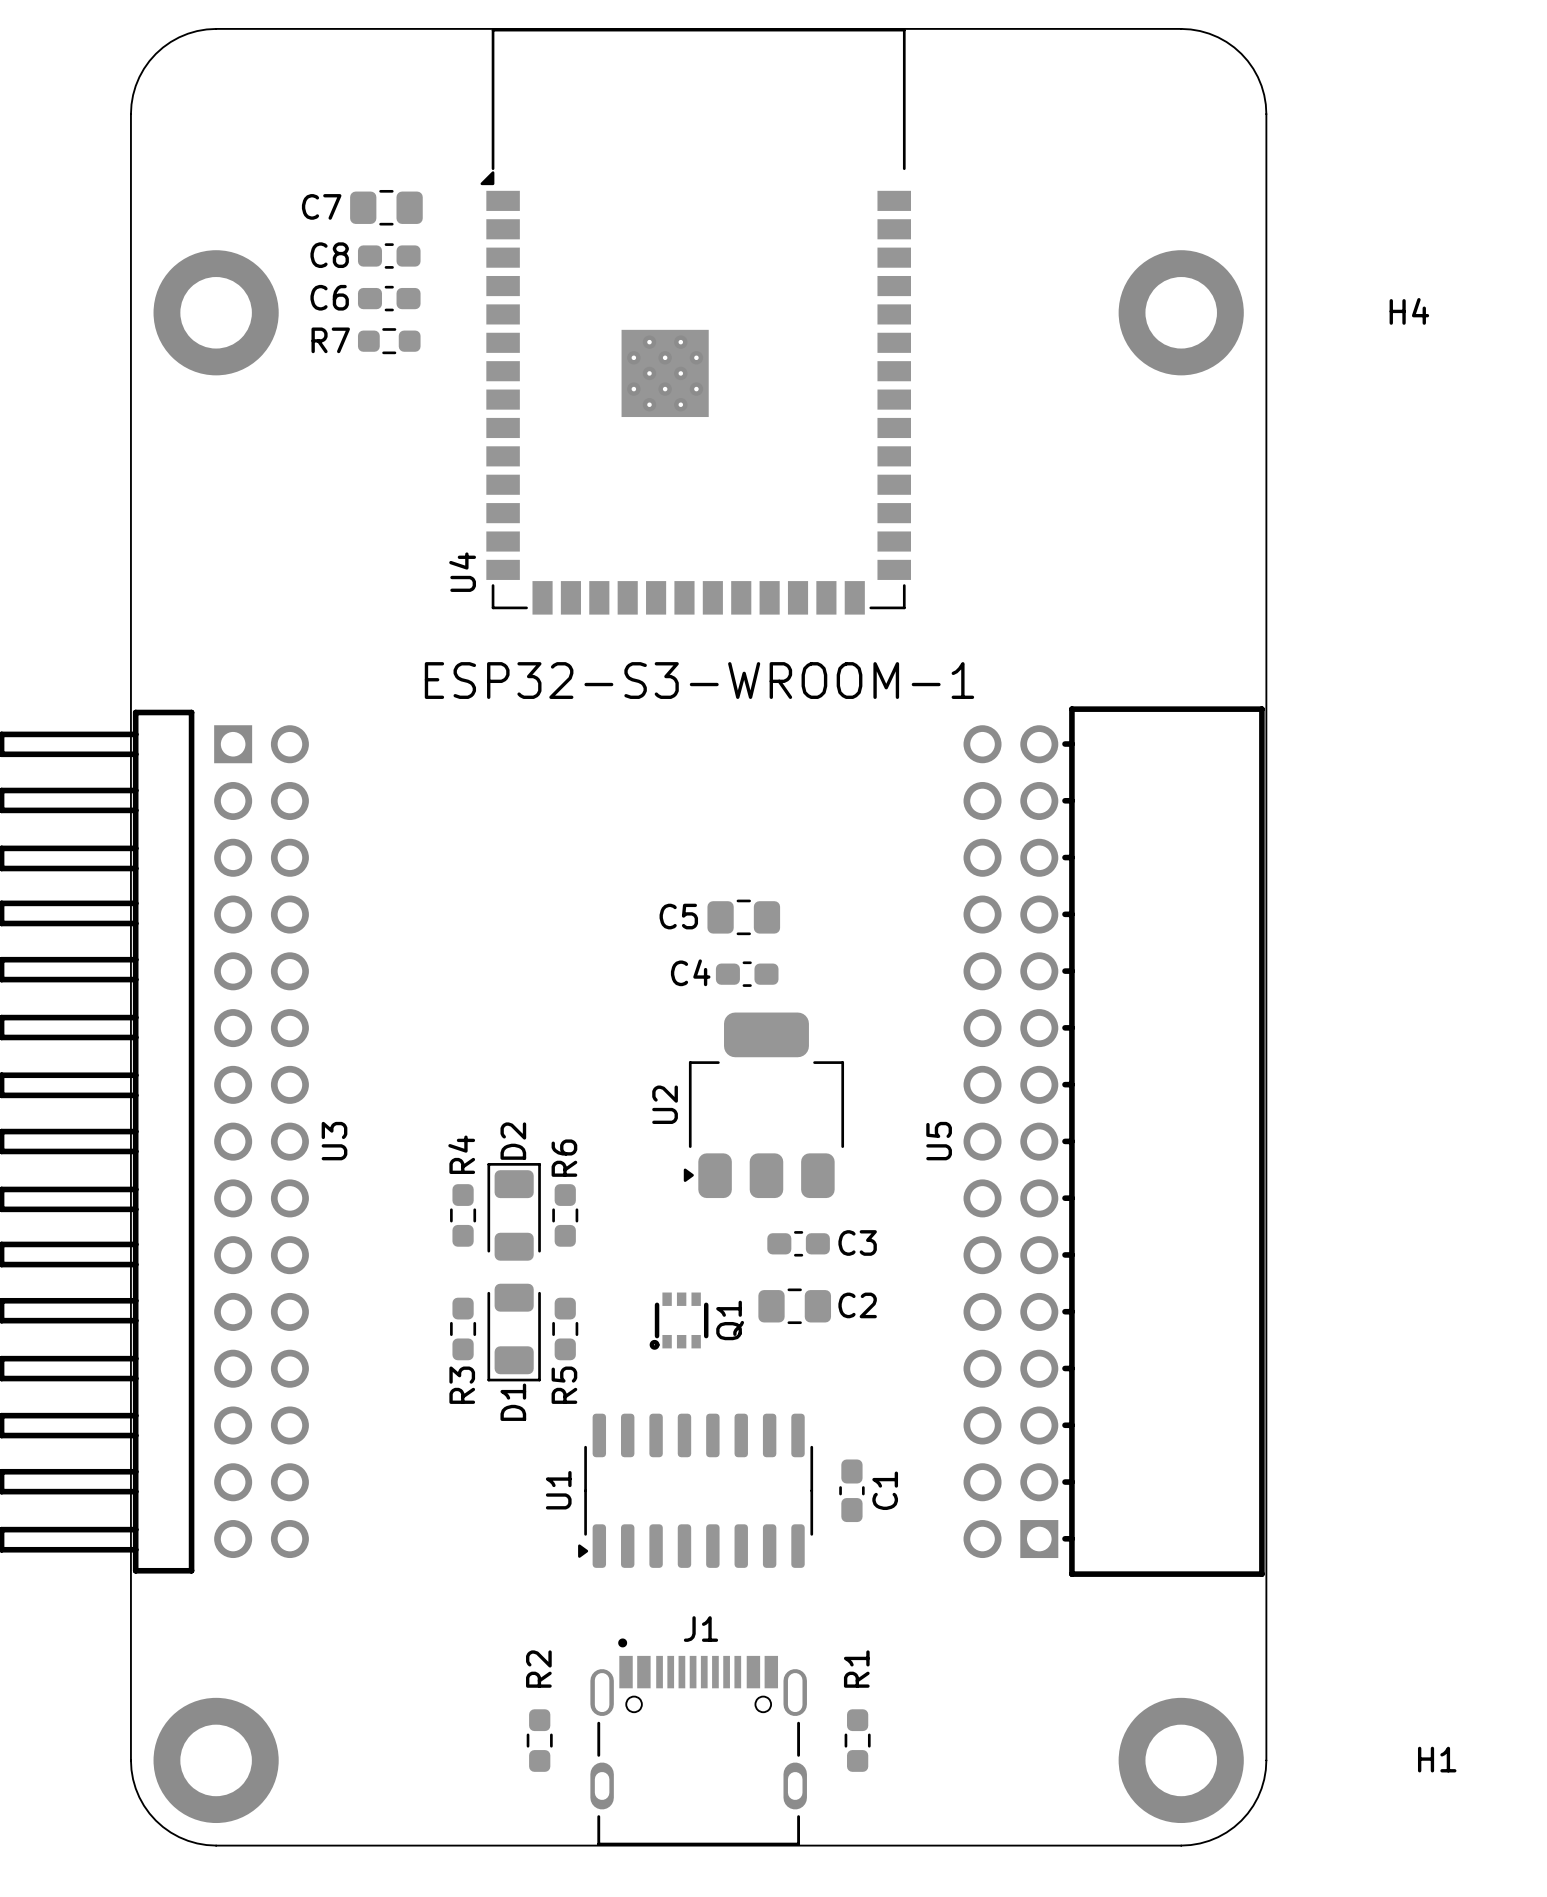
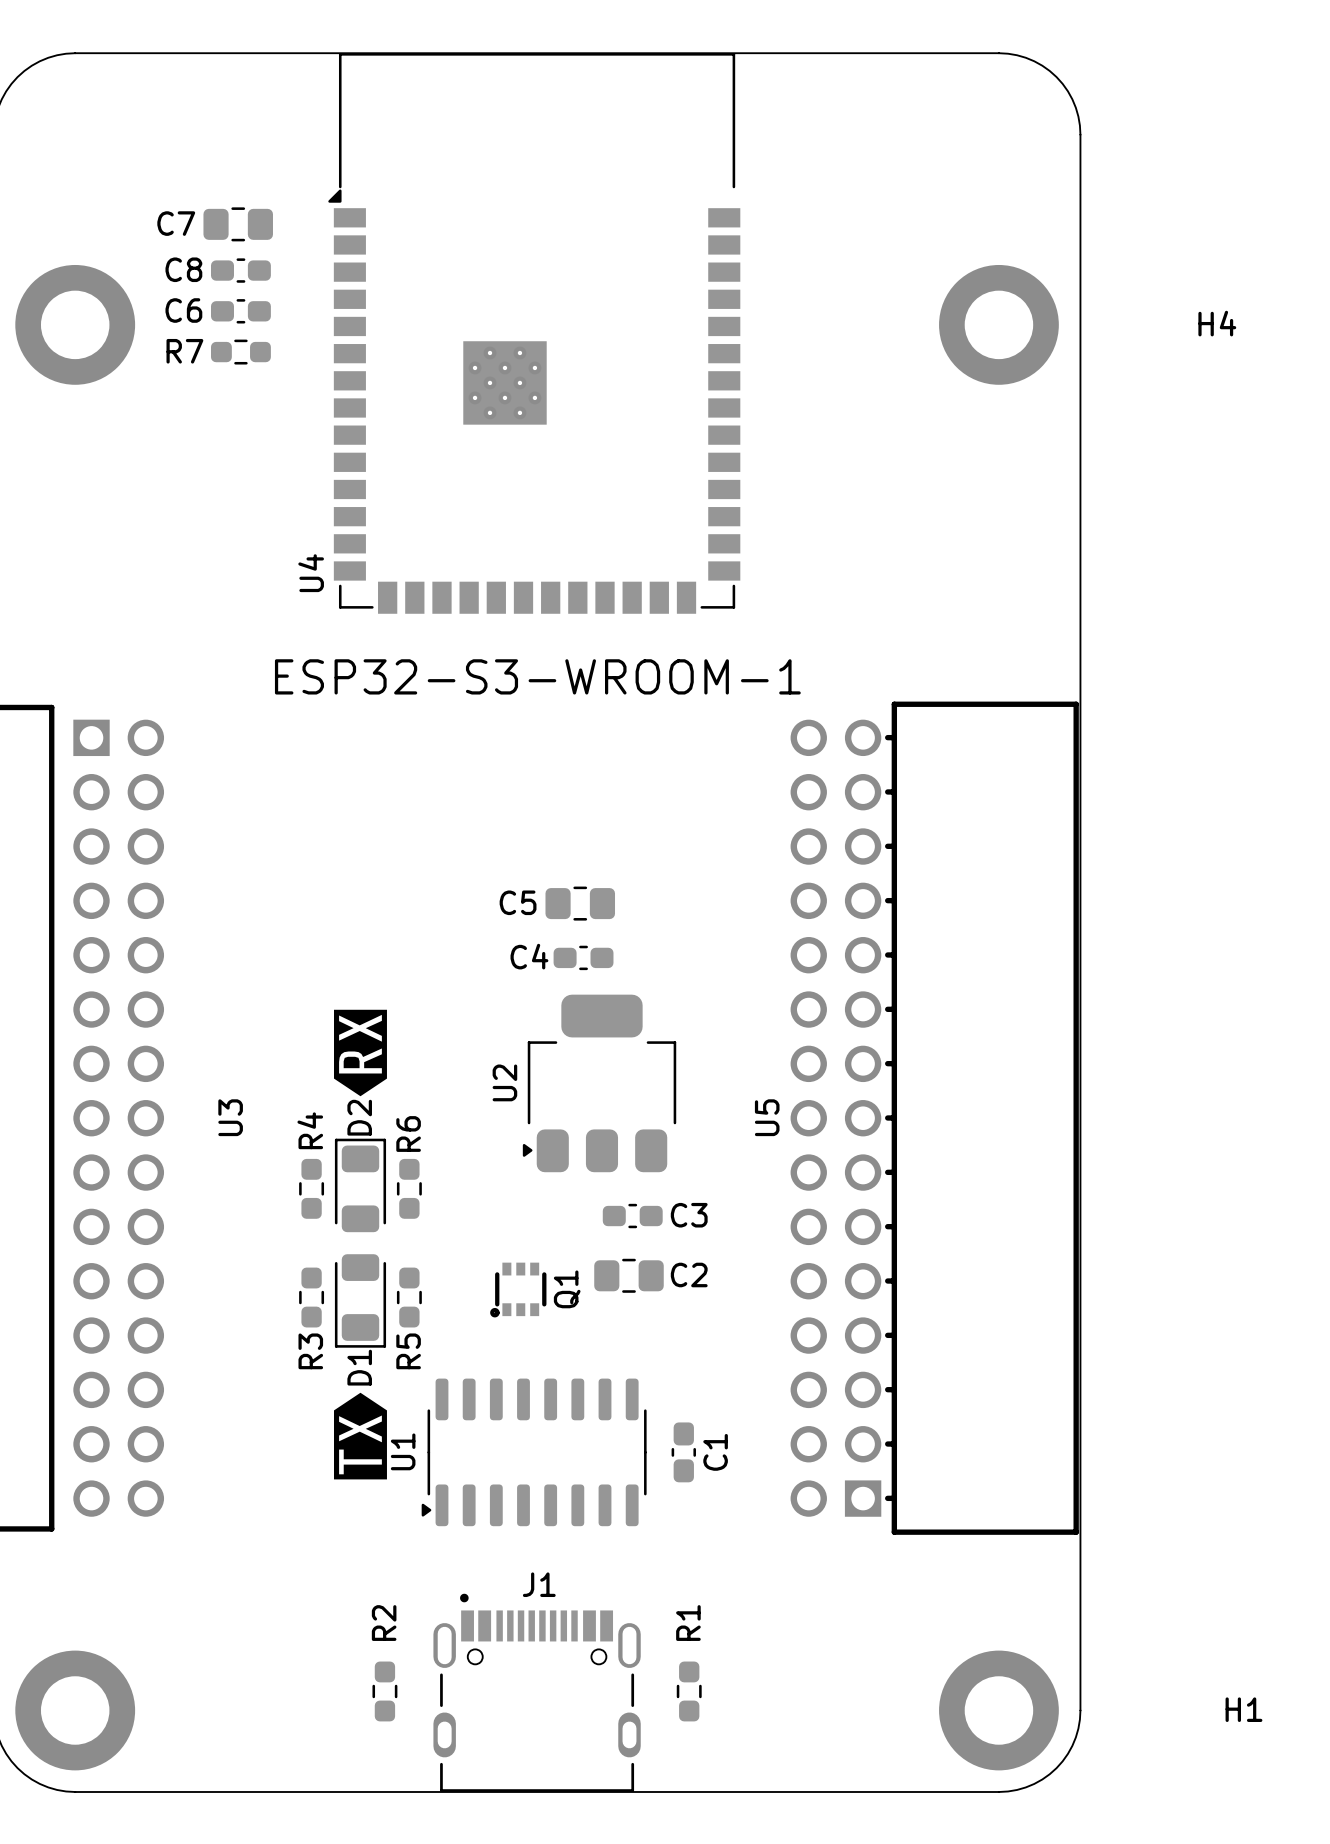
drawing: none -> [333, 1009, 387, 1097]
U3 name position: U3 (334, 1141) -> U3 (230, 1117)
drawing: none -> [333, 1392, 387, 1480]

